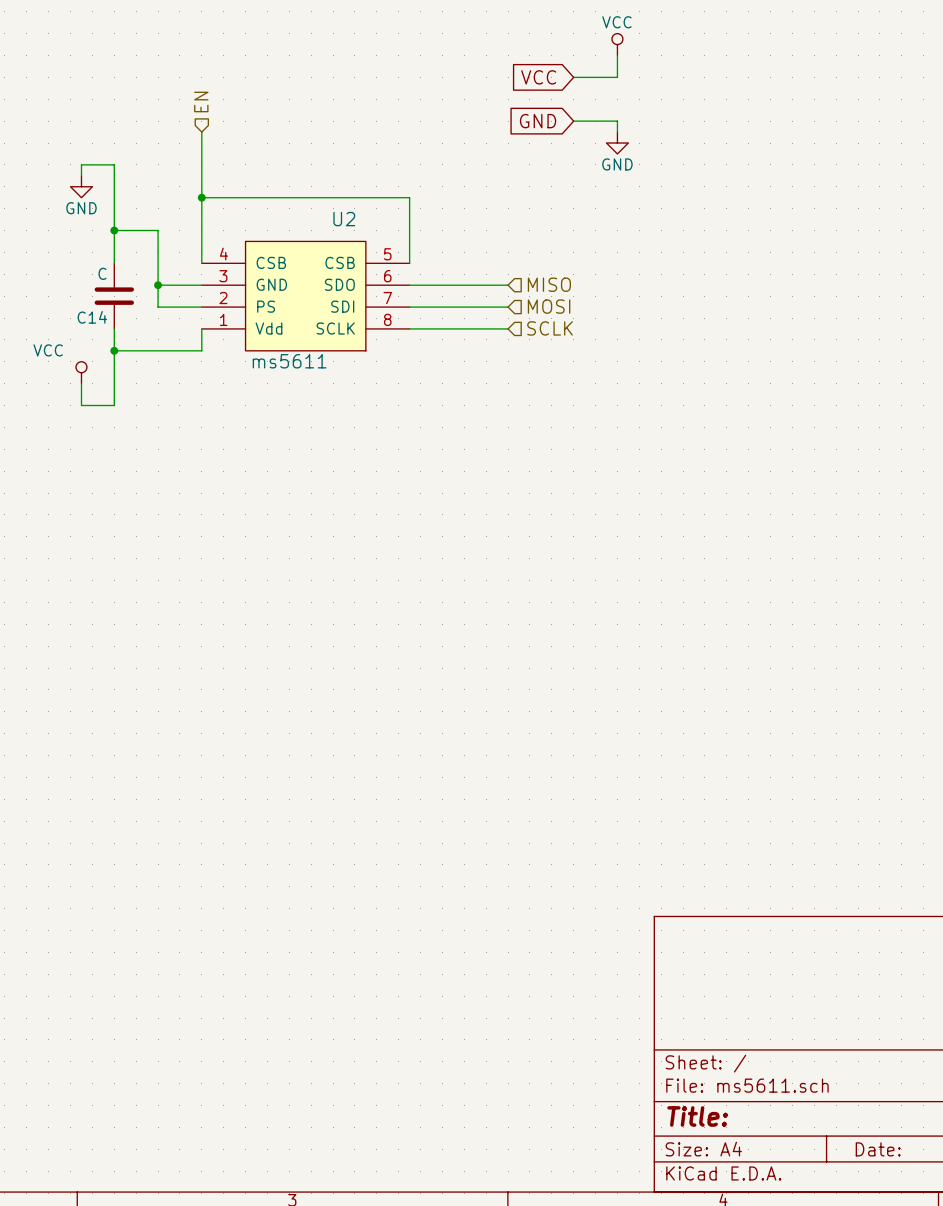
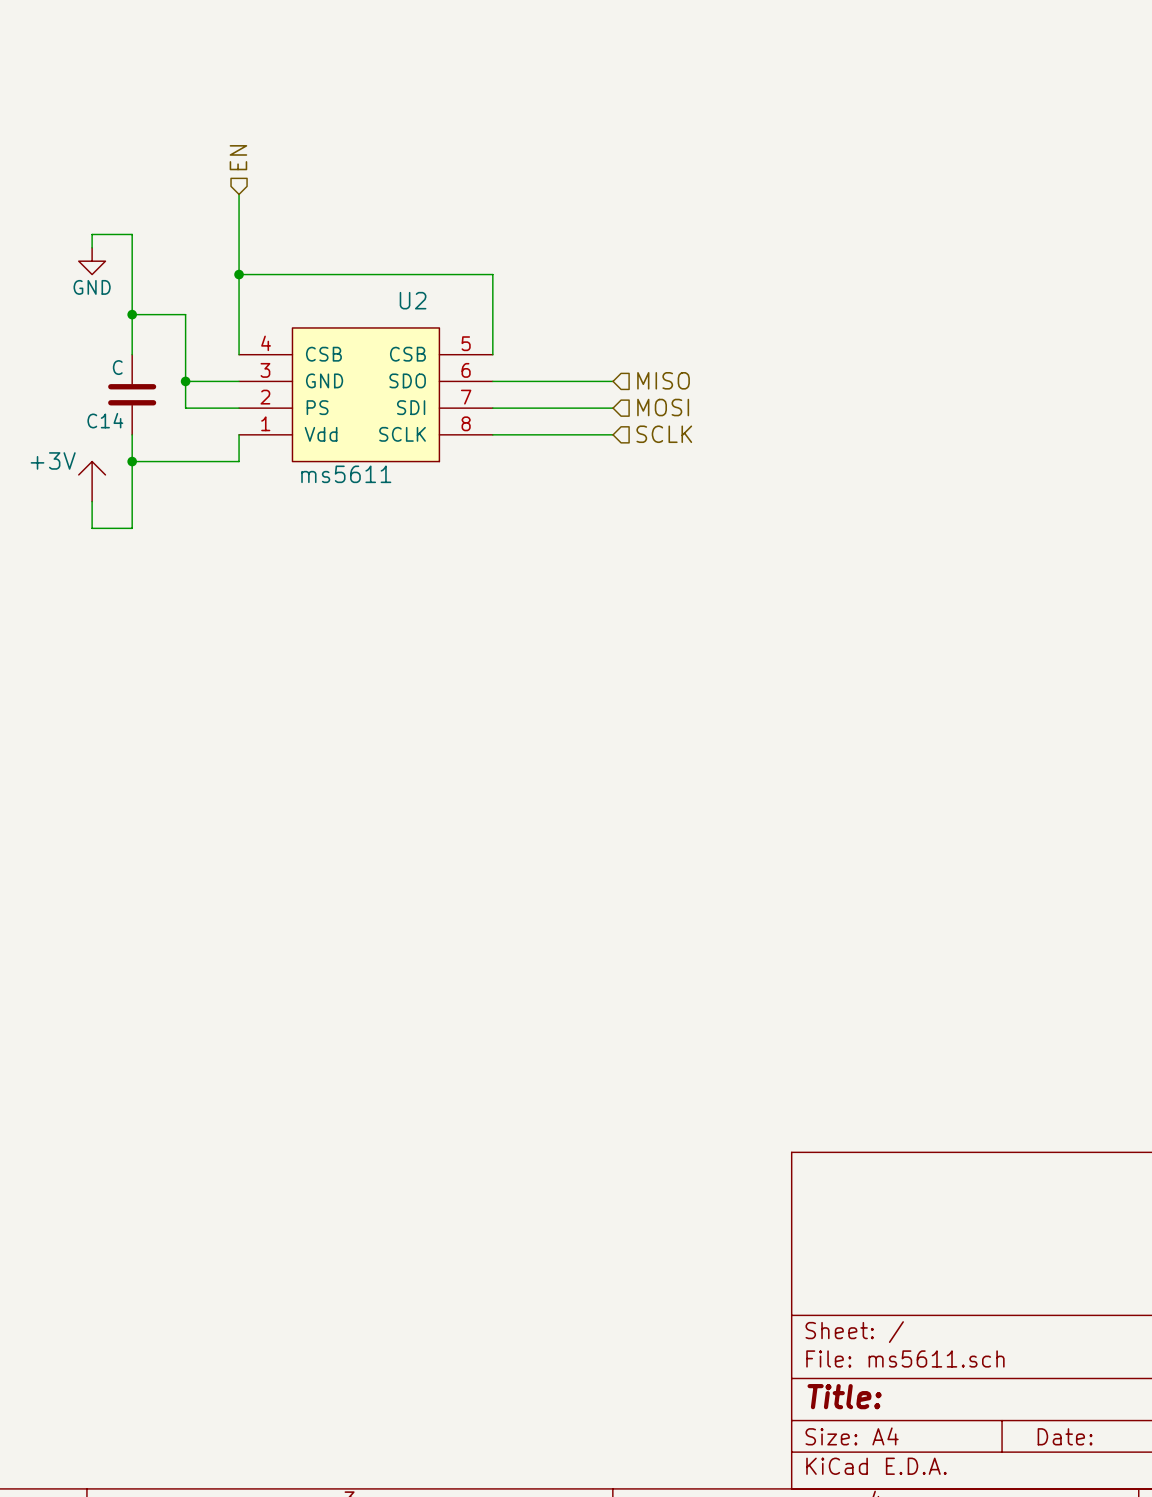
power symbol: VCC (617, 44) -> none
wire: (617, 55) (617, 77) (573, 77) -> none
global label: VCC (538, 77) -> none
global label: GND (538, 121) -> none
wire: (573, 121) (617, 121) (617, 132) -> none
power symbol: GND (617, 143) -> none
power symbol: VCC (81, 372) -> +3V (92, 481)

